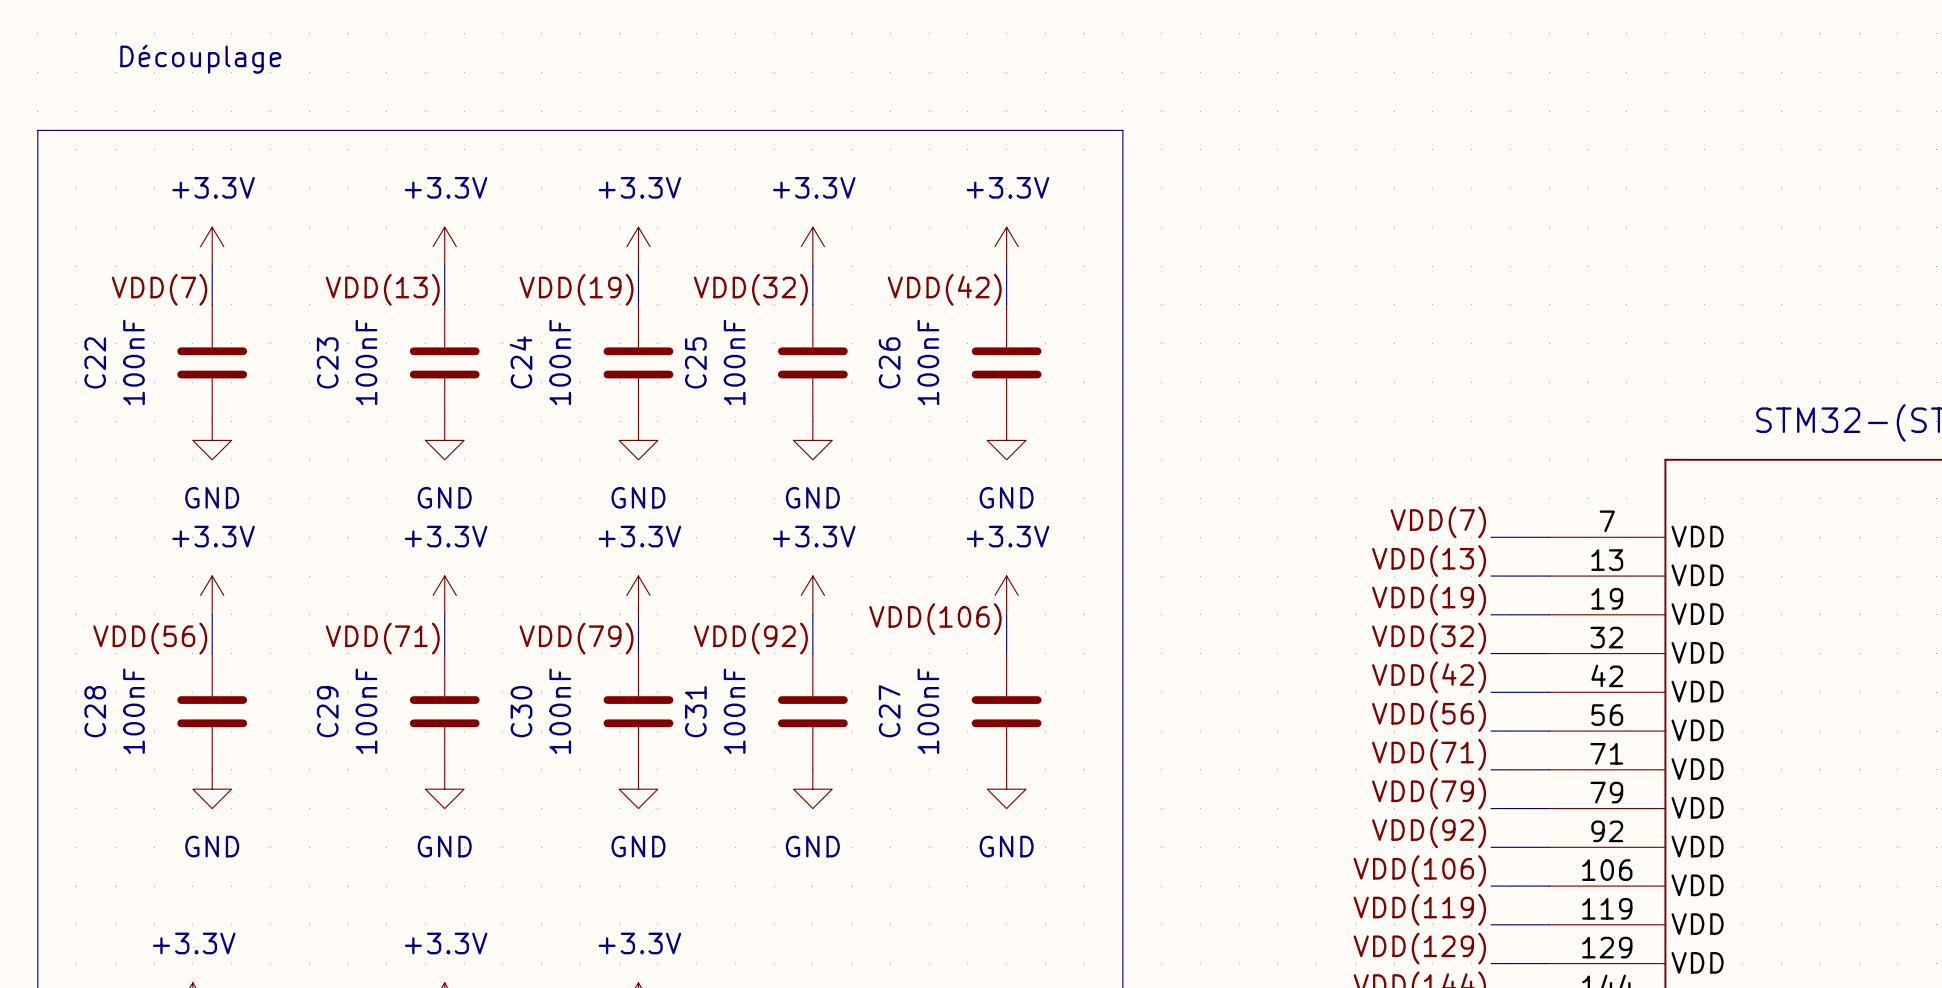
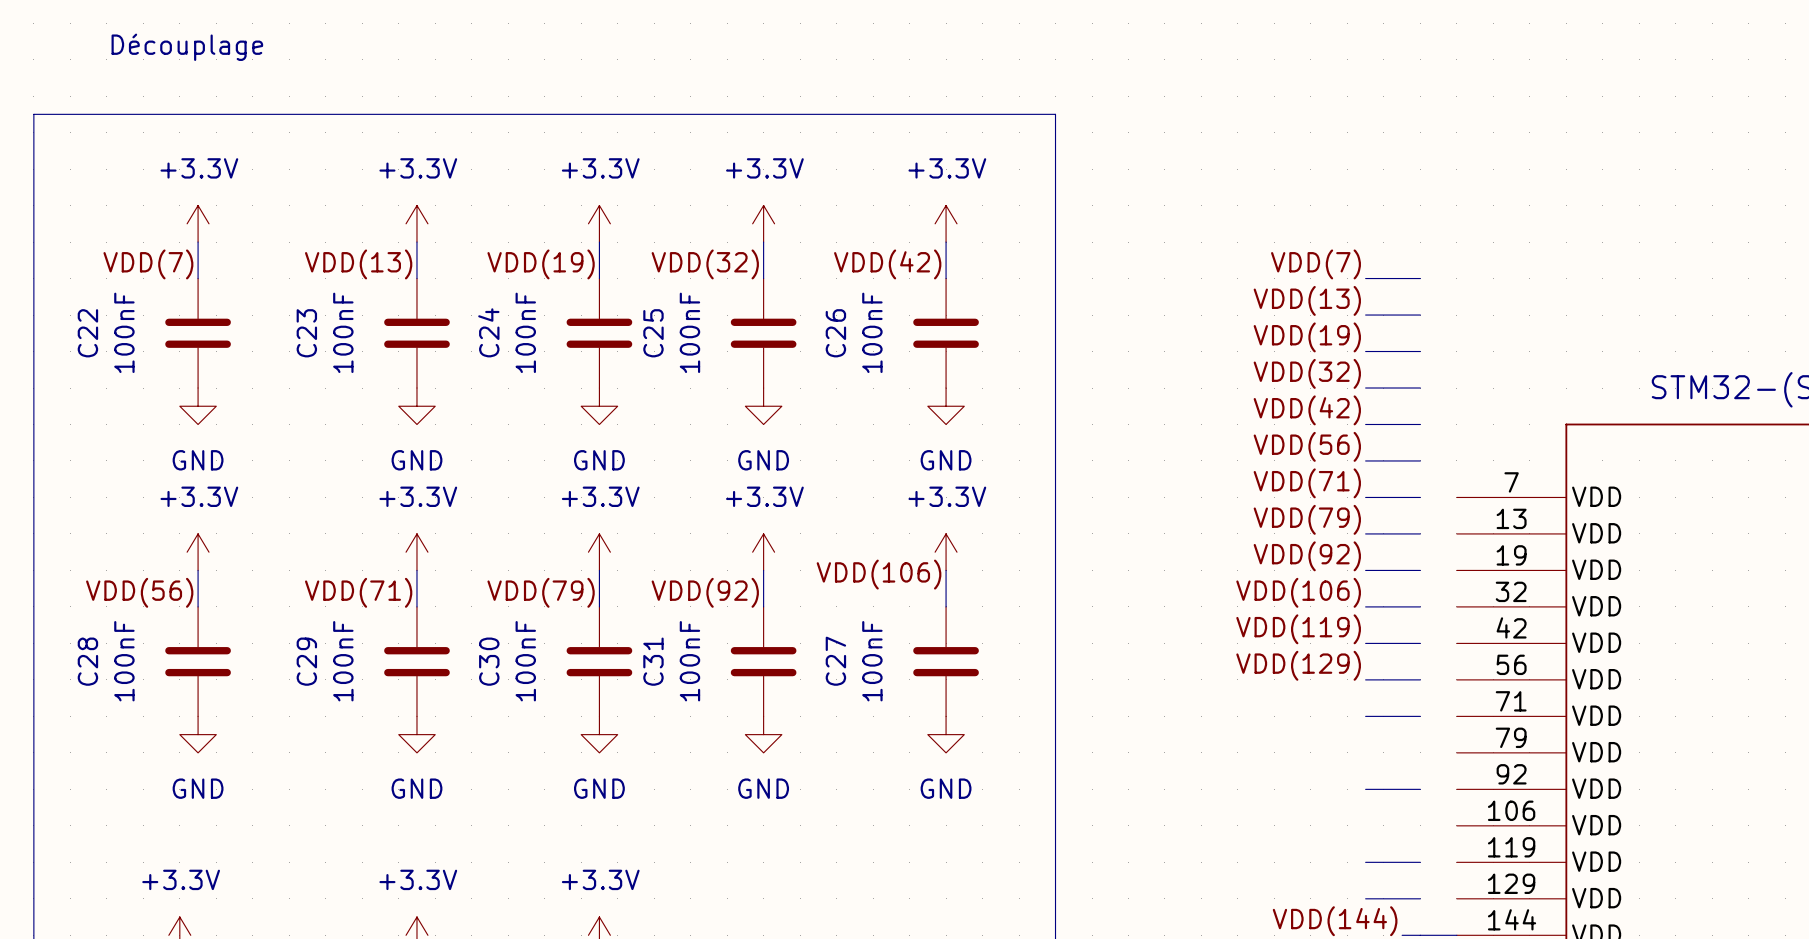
wire: none -> (1365, 278) (1420, 278)
wire: none -> (1365, 315) (1420, 315)
wire: none -> (1365, 351) (1420, 351)
wire: none -> (1365, 388) (1420, 388)
wire: none -> (1365, 460) (1420, 460)
label position: VDD(7) (1438, 522) -> VDD(7) (1315, 264)
wire: (1510, 537) (1549, 537) -> (1365, 497) (1402, 497)
label position: VDD(13) (1429, 561) -> VDD(13) (1307, 300)
wire: (1510, 576) (1549, 576) -> (1365, 533) (1402, 533)
label position: VDD(19) (1429, 599) -> VDD(19) (1307, 337)
wire: (1510, 614) (1549, 614) -> (1365, 570) (1402, 570)
label position: VDD(32) (1429, 638) -> VDD(32) (1307, 373)
wire: (1510, 653) (1549, 653) -> (1365, 606) (1402, 606)
label position: VDD(42) (1429, 677) -> VDD(42) (1307, 410)
wire: (1510, 692) (1549, 692) -> (1365, 643) (1402, 643)
label position: VDD(56) (1429, 716) -> VDD(56) (1307, 446)
wire: (1510, 731) (1549, 731) -> (1365, 679) (1402, 679)
label position: VDD(71) (1429, 754) -> VDD(71) (1307, 483)
wire: (1510, 769) (1549, 769) -> (1365, 716) (1402, 716)
label position: VDD(79) (1429, 793) -> VDD(79) (1307, 519)
wire: (1491, 808) (1549, 808) -> (1365, 424) (1420, 424)
label position: VDD(92) (1429, 832) -> VDD(92) (1307, 556)
wire: (1510, 847) (1549, 847) -> (1365, 789) (1402, 789)
label position: VDD(106) (1419, 871) -> VDD(106) (1298, 592)
wire: (1491, 886) (1549, 886) -> none
label position: VDD(119) (1419, 909) -> VDD(119) (1298, 629)
wire: (1510, 924) (1549, 924) -> (1365, 862) (1402, 862)
label position: VDD(129) (1419, 948) -> VDD(129) (1298, 665)
wire: (1510, 963) (1549, 963) -> (1365, 898) (1402, 898)

